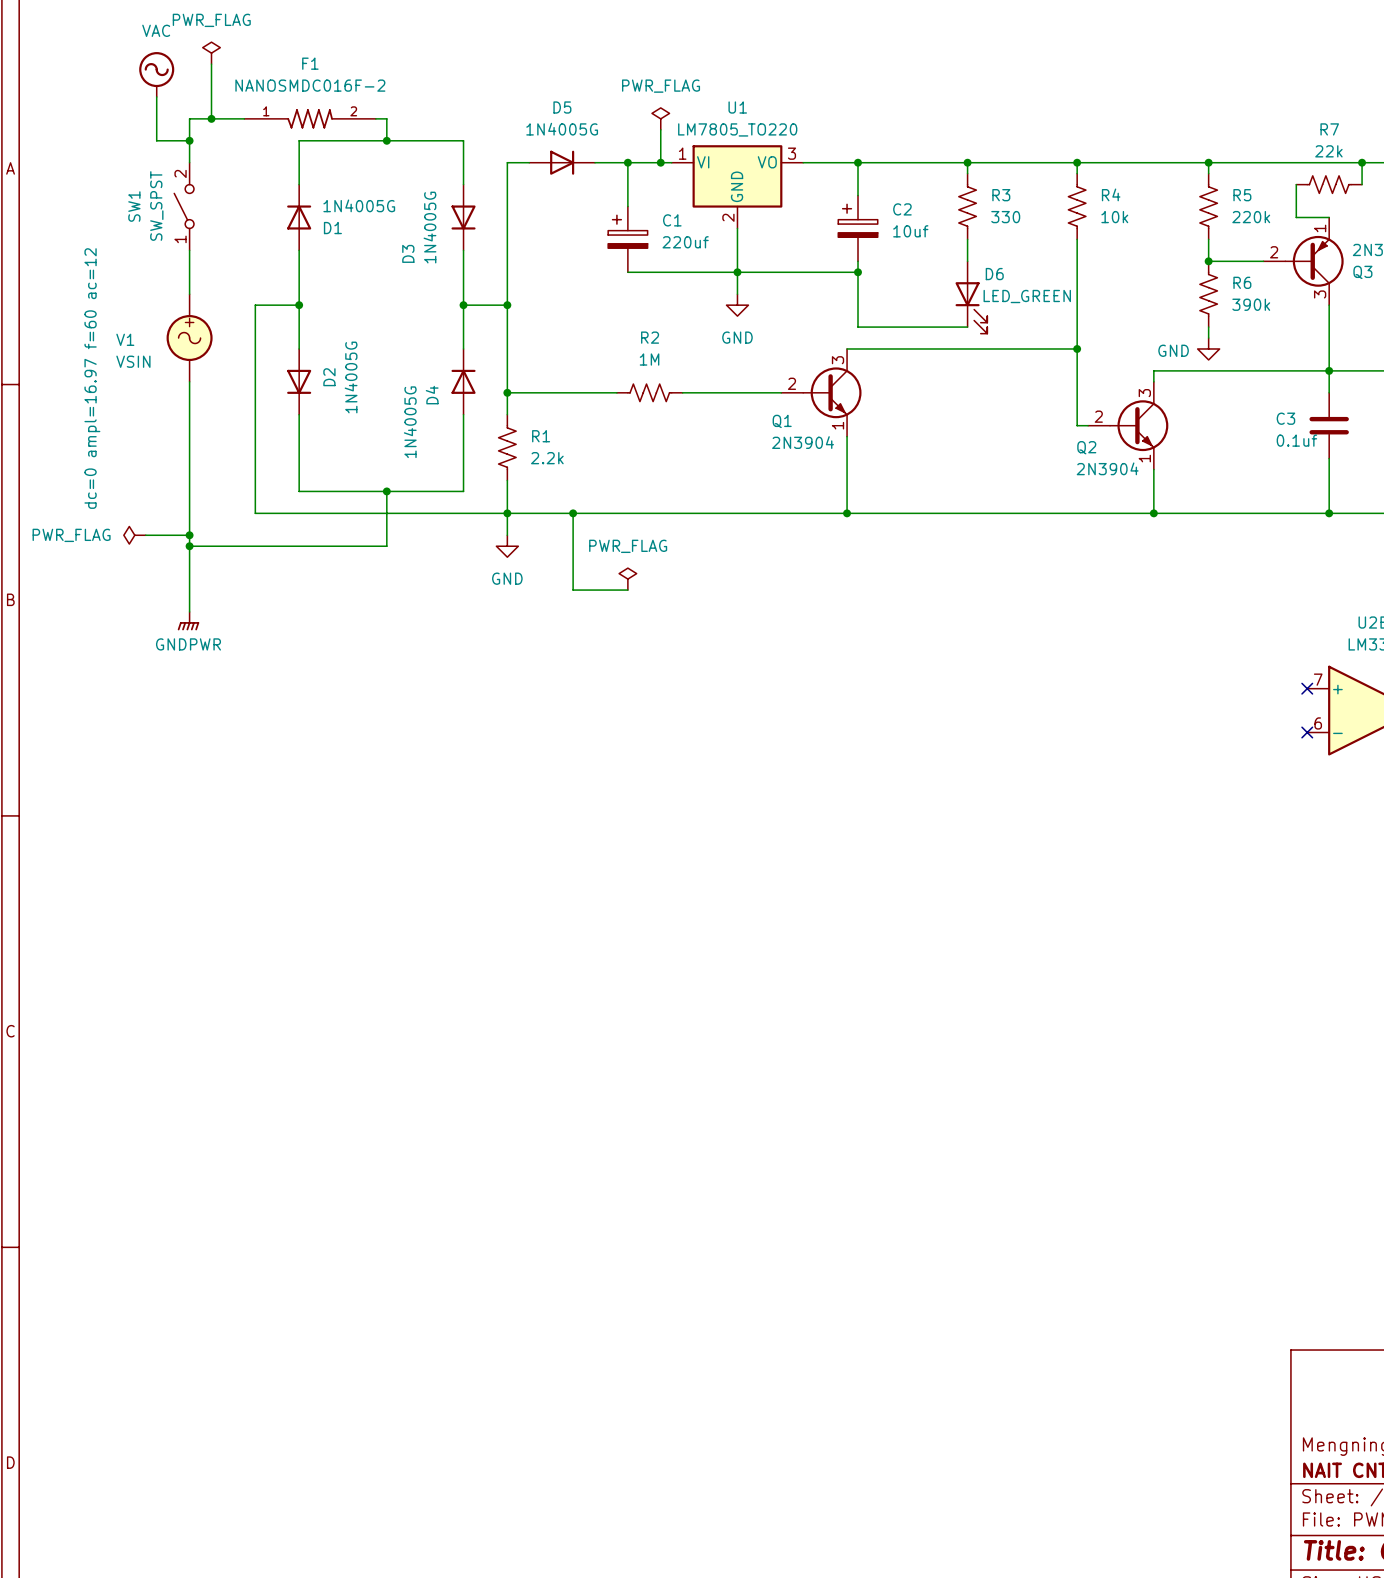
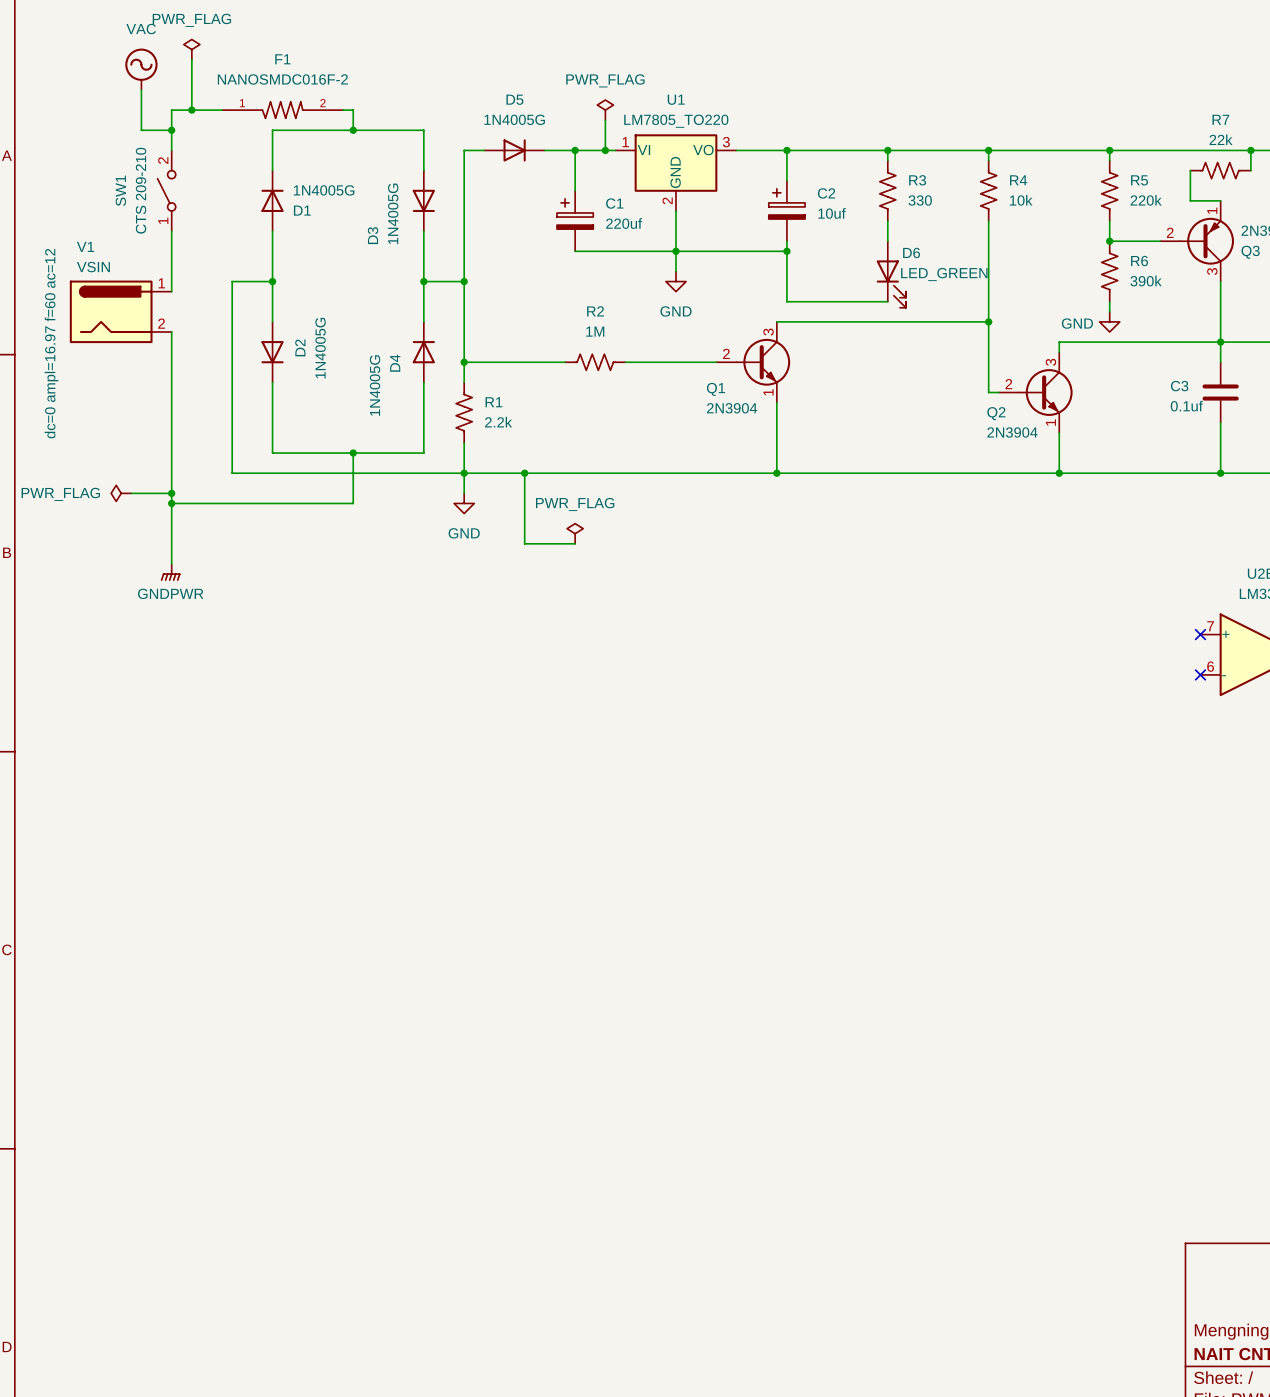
SW1 value: SW_SPST (156, 206) -> CTS 209-210 (141, 190)
V1 symbol: [166, 294, 213, 382] -> [69, 280, 172, 344]
V1 name position: V1 (125, 339) -> V1 (85, 246)
V1 value position: VSIN (133, 361) -> VSIN (93, 267)
V1 text position: dc=0 ampl=16.97 f=60 ac=12 (92, 378) -> dc=0 ampl=16.97 f=60 ac=12 (51, 343)

